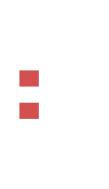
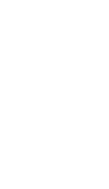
part: (29, 94) -> none

